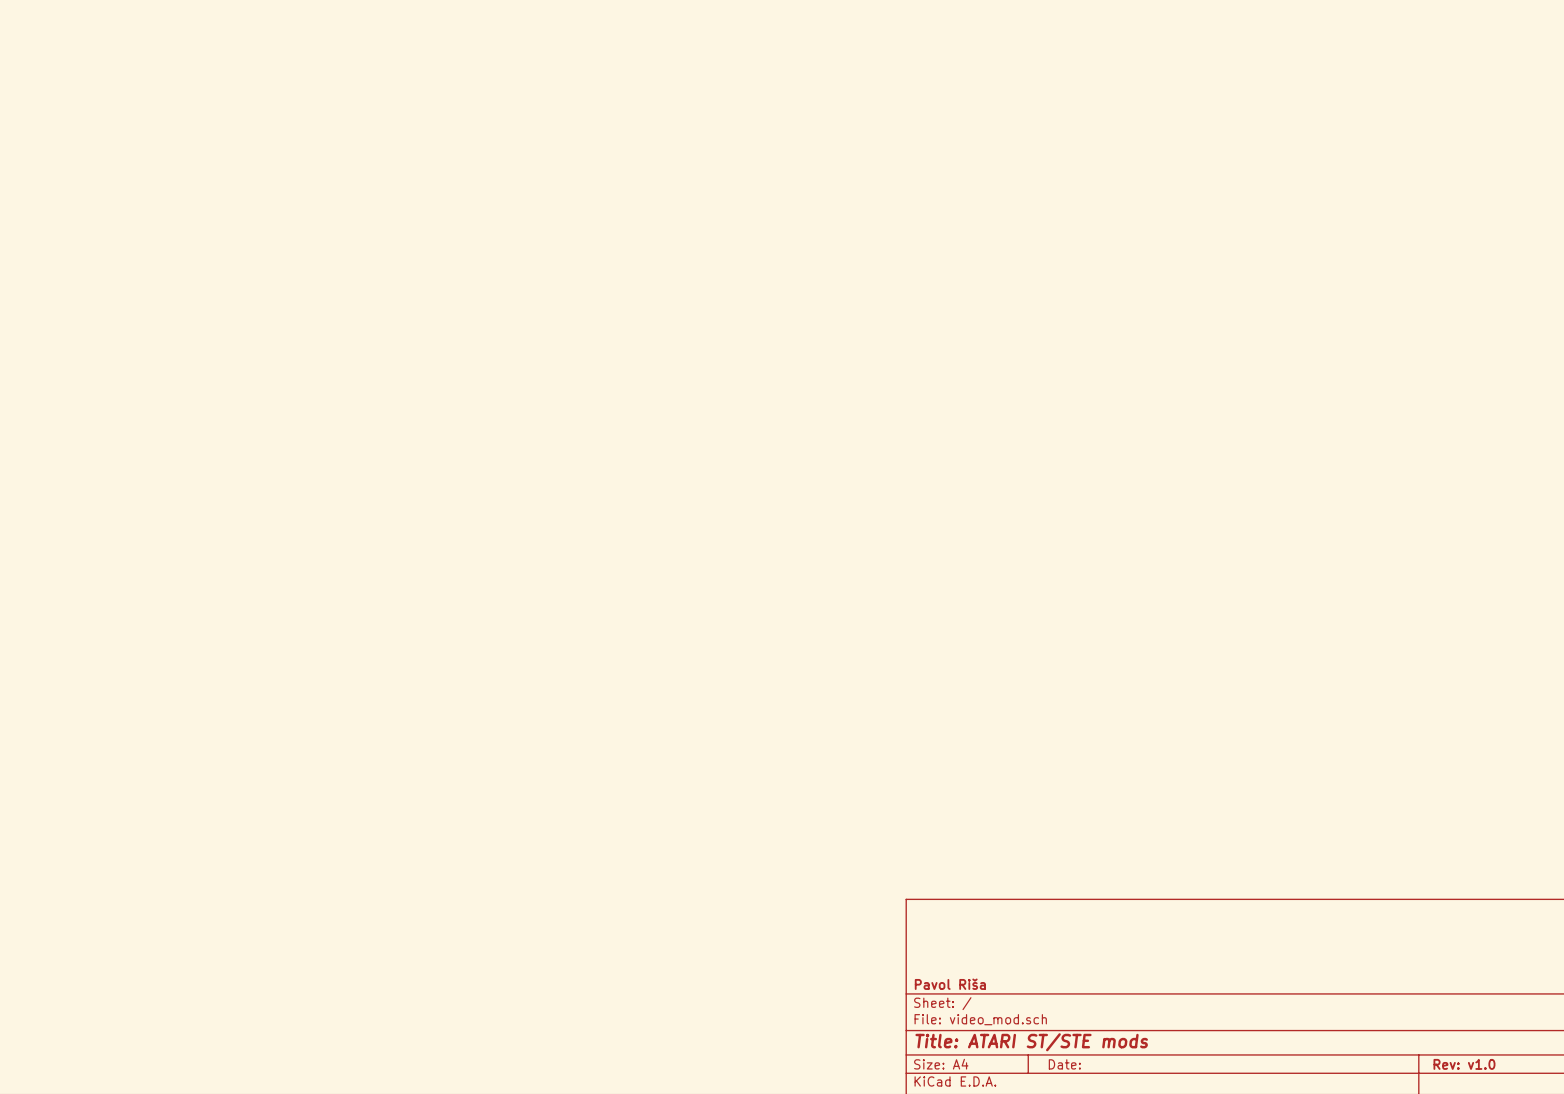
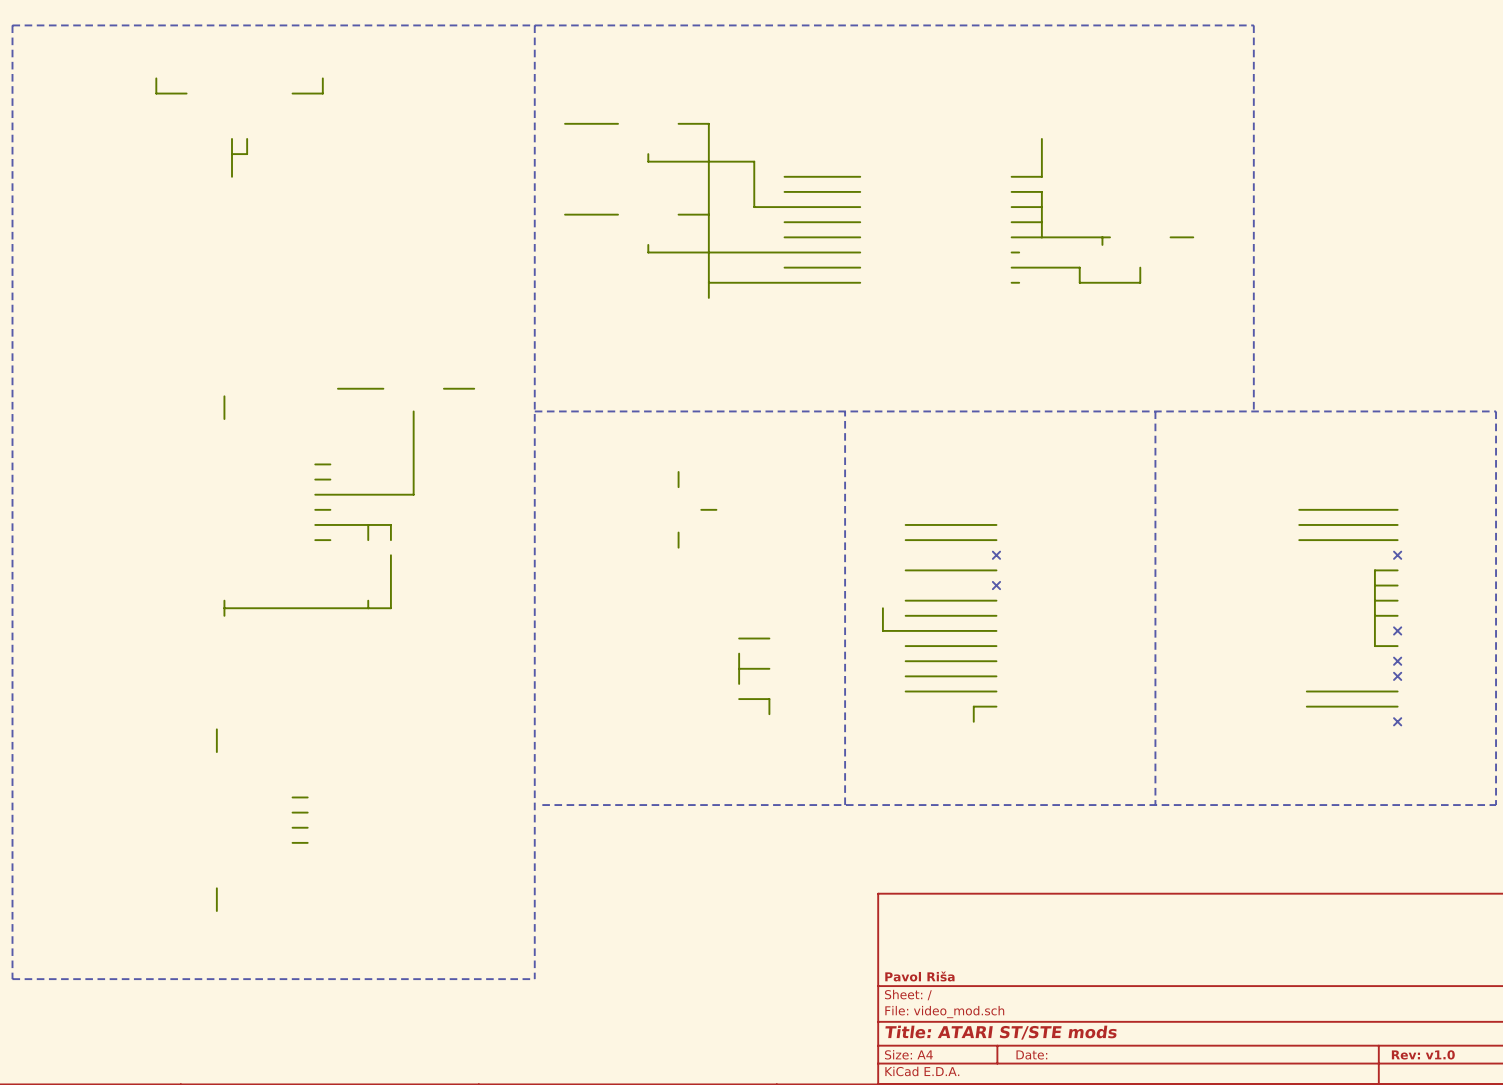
line: none -> (534, 25) (534, 979) (12, 979) (12, 25) (1253, 25) (1253, 411)
wire: none -> (156, 78) (156, 93) (186, 93)
wire: none -> (322, 78) (322, 93) (292, 93)
wire: none -> (565, 123) (618, 123)
wire: none -> (678, 123) (708, 123) (708, 297)
wire: none -> (232, 138) (232, 176)
wire: none -> (247, 138) (247, 154) (232, 154)
wire: none -> (1041, 138) (1041, 176) (1011, 176)
wire: none -> (648, 154) (648, 161) (754, 161) (754, 207) (860, 207)
wire: none -> (784, 176) (860, 176)
wire: none -> (784, 191) (860, 191)
wire: none -> (1011, 191) (1041, 191) (1041, 237)
wire: none -> (1011, 207) (1041, 207)
wire: none -> (565, 214) (618, 214)
wire: none -> (678, 214) (708, 214)
wire: none -> (784, 222) (860, 222)
wire: none -> (1011, 222) (1041, 222)
wire: none -> (784, 237) (860, 237)
wire: none -> (1011, 237) (1110, 237)
wire: none -> (1102, 237) (1102, 244)
wire: none -> (1170, 237) (1193, 237)
wire: none -> (648, 244) (648, 252) (860, 252)
wire: none -> (1011, 252) (1019, 252)
wire: none -> (784, 267) (860, 267)
wire: none -> (1011, 267) (1079, 267) (1079, 282) (1140, 282) (1140, 267)
wire: none -> (708, 282) (860, 282)
wire: none -> (1011, 282) (1019, 282)
wire: none -> (337, 388) (383, 388)
wire: none -> (443, 388) (474, 388)
wire: none -> (224, 396) (224, 419)
wire: none -> (413, 411) (413, 494) (315, 494)
line: none -> (534, 411) (1496, 411) (1496, 805) (542, 805)
line: none -> (845, 411) (845, 805)
line: none -> (1155, 411) (1155, 805)
wire: none -> (315, 464) (330, 464)
wire: none -> (678, 472) (678, 487)
wire: none -> (315, 479) (330, 479)
wire: none -> (315, 509) (330, 509)
wire: none -> (701, 509) (716, 509)
wire: none -> (1299, 509) (1397, 509)
wire: none -> (315, 524) (390, 524) (390, 540)
wire: none -> (368, 524) (368, 540)
wire: none -> (905, 524) (996, 524)
wire: none -> (1299, 524) (1397, 524)
wire: none -> (678, 532) (678, 547)
wire: none -> (315, 540) (330, 540)
wire: none -> (905, 540) (996, 540)
wire: none -> (1299, 540) (1397, 540)
wire: none -> (390, 555) (390, 608) (224, 608)
no-connect mark: none -> (996, 555)
no-connect mark: none -> (1397, 555)
wire: none -> (905, 570) (996, 570)
wire: none -> (1397, 570) (1374, 570) (1374, 646) (1397, 646)
no-connect mark: none -> (996, 585)
wire: none -> (1374, 585) (1397, 585)
wire: none -> (224, 600) (224, 615)
wire: none -> (368, 600) (368, 608)
wire: none -> (905, 600) (996, 600)
wire: none -> (1374, 600) (1397, 600)
wire: none -> (882, 608) (882, 630) (996, 630)
wire: none -> (905, 615) (996, 615)
wire: none -> (1374, 615) (1397, 615)
no-connect mark: none -> (1397, 630)
wire: none -> (739, 638) (769, 638)
wire: none -> (905, 646) (996, 646)
wire: none -> (739, 653) (739, 683)
wire: none -> (905, 661) (996, 661)
no-connect mark: none -> (1397, 661)
wire: none -> (739, 668) (769, 668)
wire: none -> (905, 676) (996, 676)
no-connect mark: none -> (1397, 676)
wire: none -> (905, 691) (996, 691)
wire: none -> (1306, 691) (1397, 691)
wire: none -> (739, 699) (769, 699) (769, 714)
wire: none -> (996, 706) (973, 706) (973, 721)
wire: none -> (1306, 706) (1397, 706)
no-connect mark: none -> (1397, 721)
wire: none -> (216, 729) (216, 752)
wire: none -> (292, 797) (307, 797)
wire: none -> (292, 812) (307, 812)
wire: none -> (292, 827) (307, 827)
wire: none -> (292, 842) (307, 842)
wire: none -> (216, 888) (216, 911)

